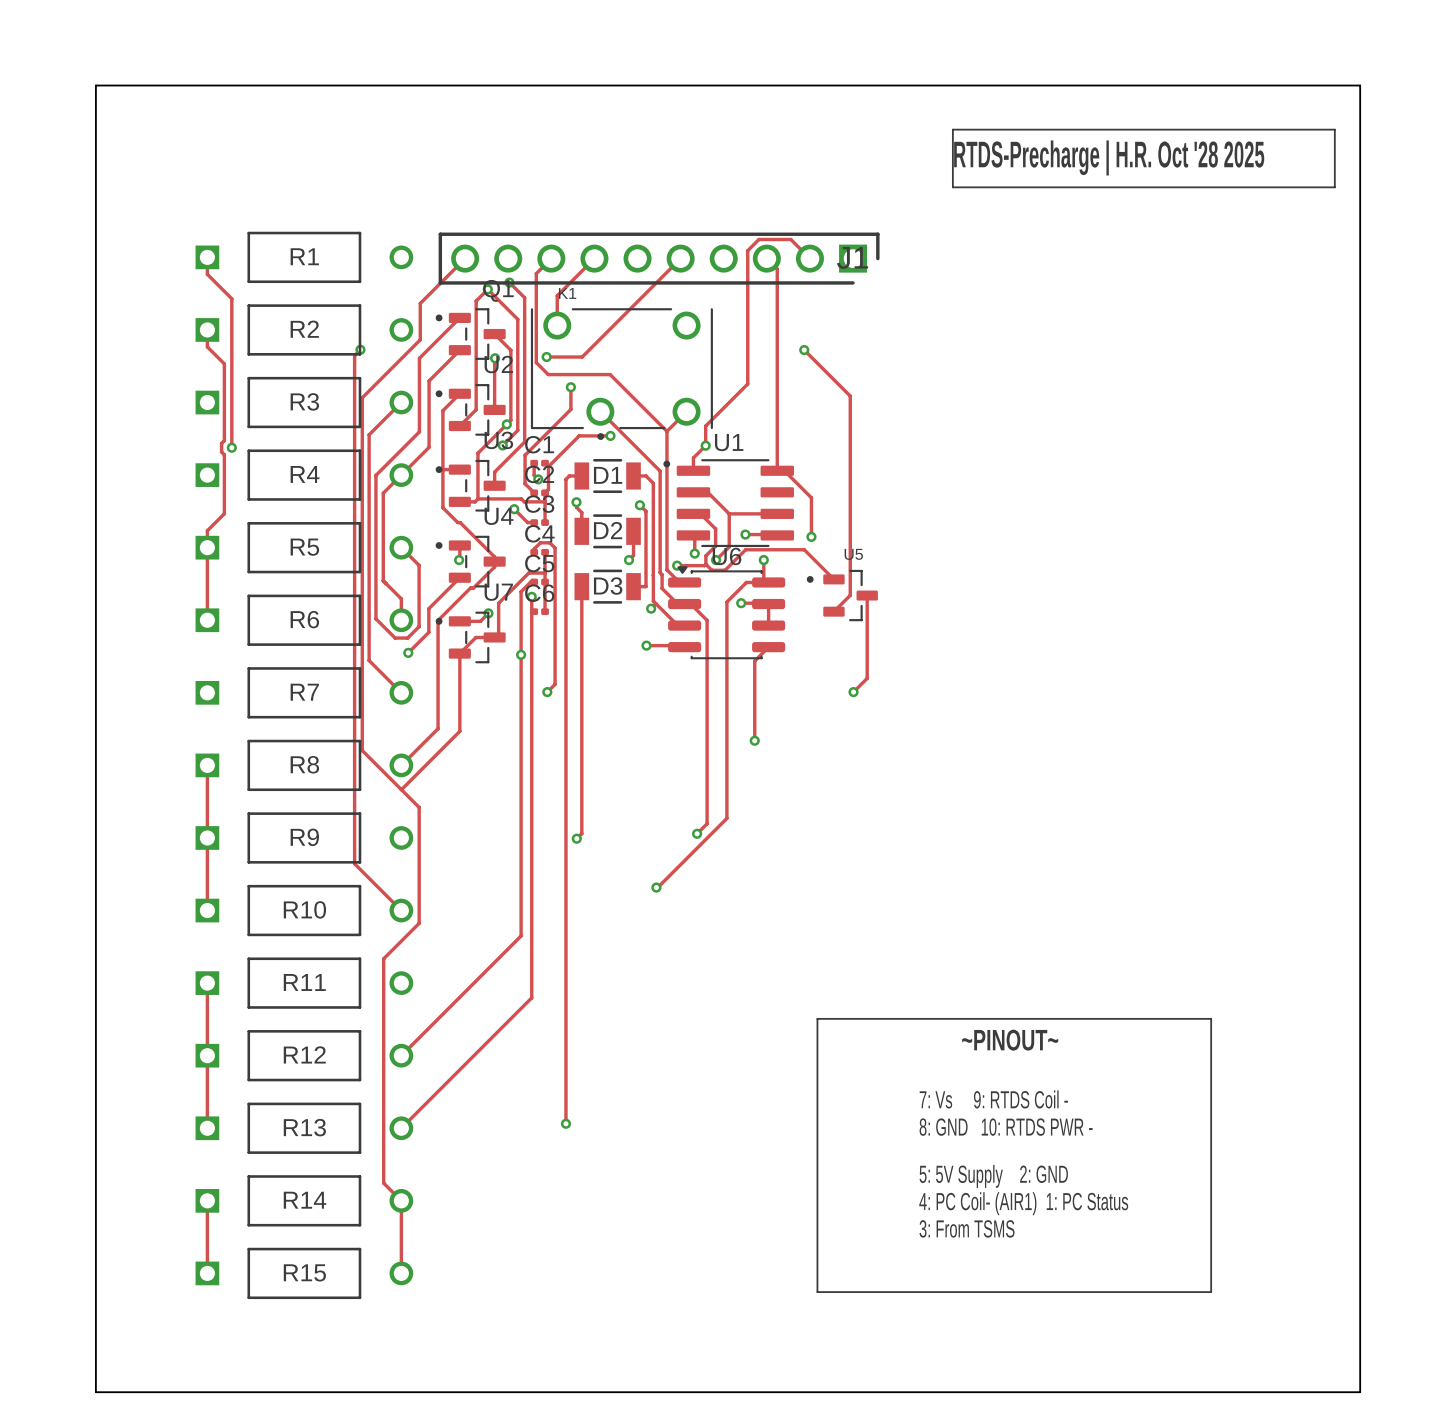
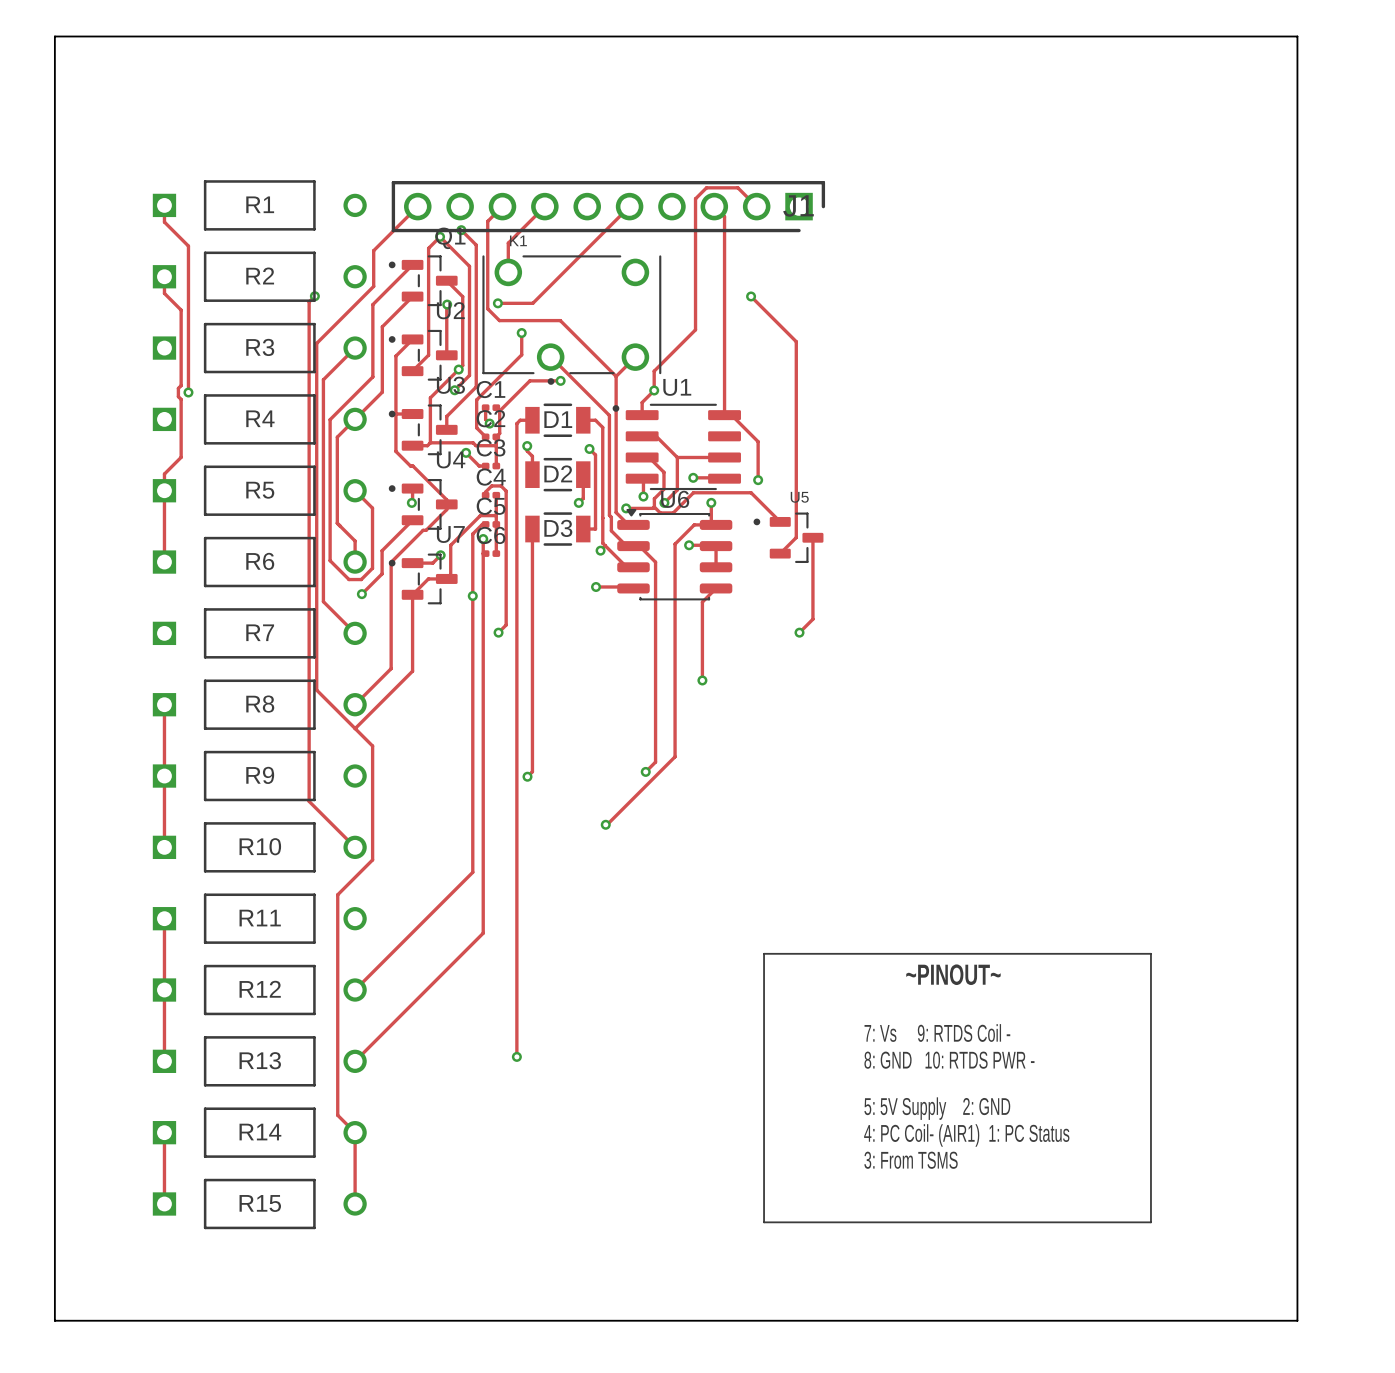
line: (952, 129) (1334, 129) (1334, 187) (952, 187) (952, 129) -> none
text: RTDS-Precharge | H.R. Oct '28 2025 (1109, 157) -> none

